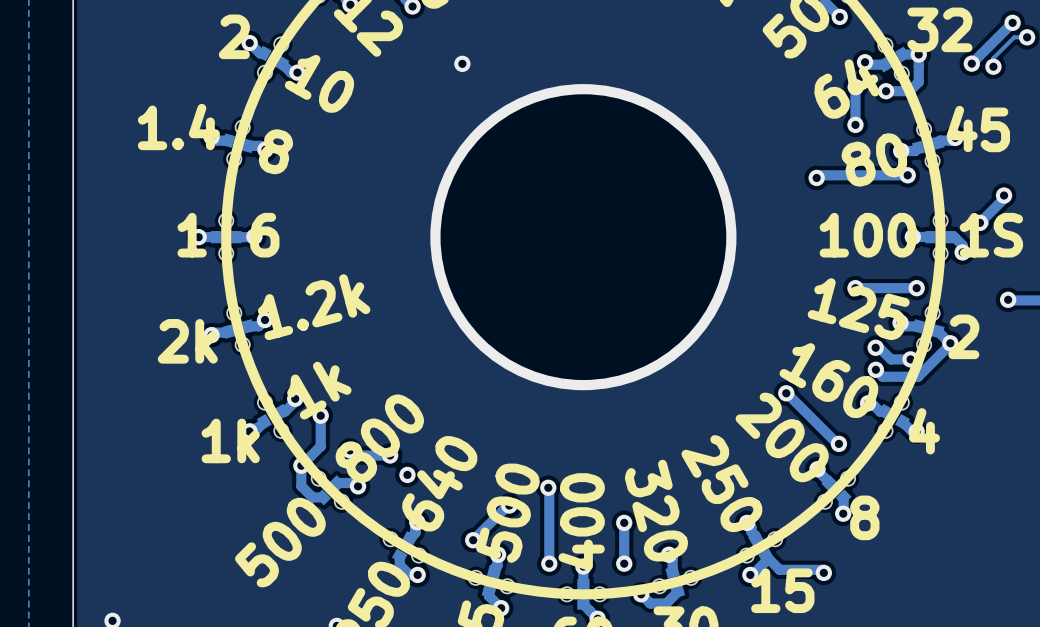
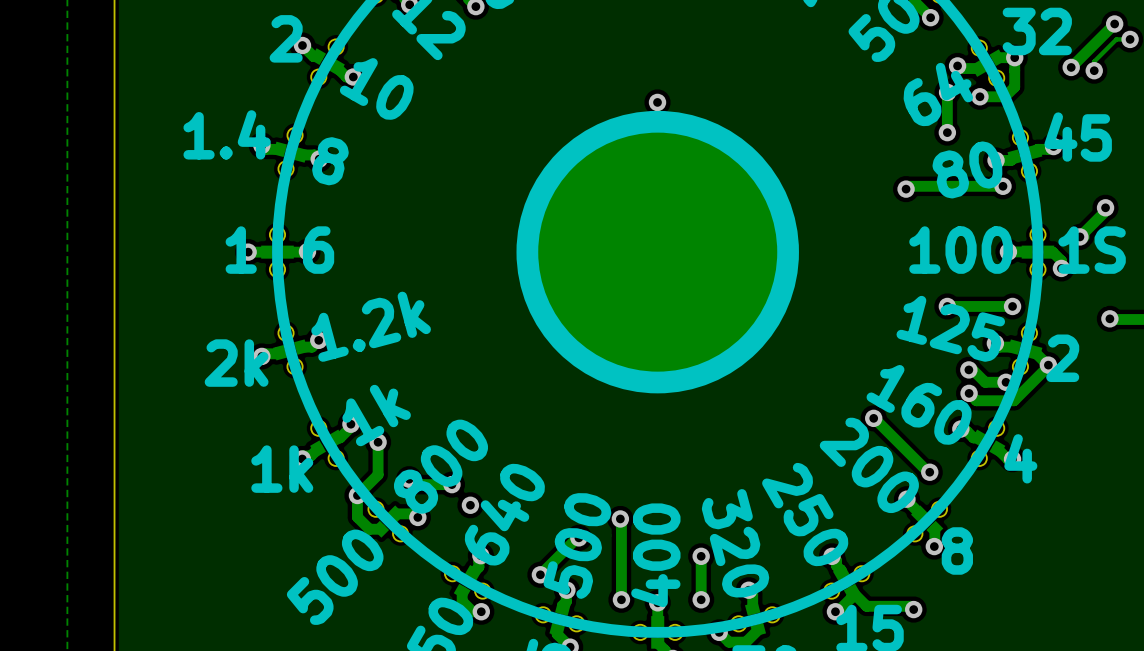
via: (462, 63) -> none
via: none -> (657, 102)
drawing: none -> [516, 110, 799, 394]
via: (583, 237) -> none
part: none -> (657, 252)

